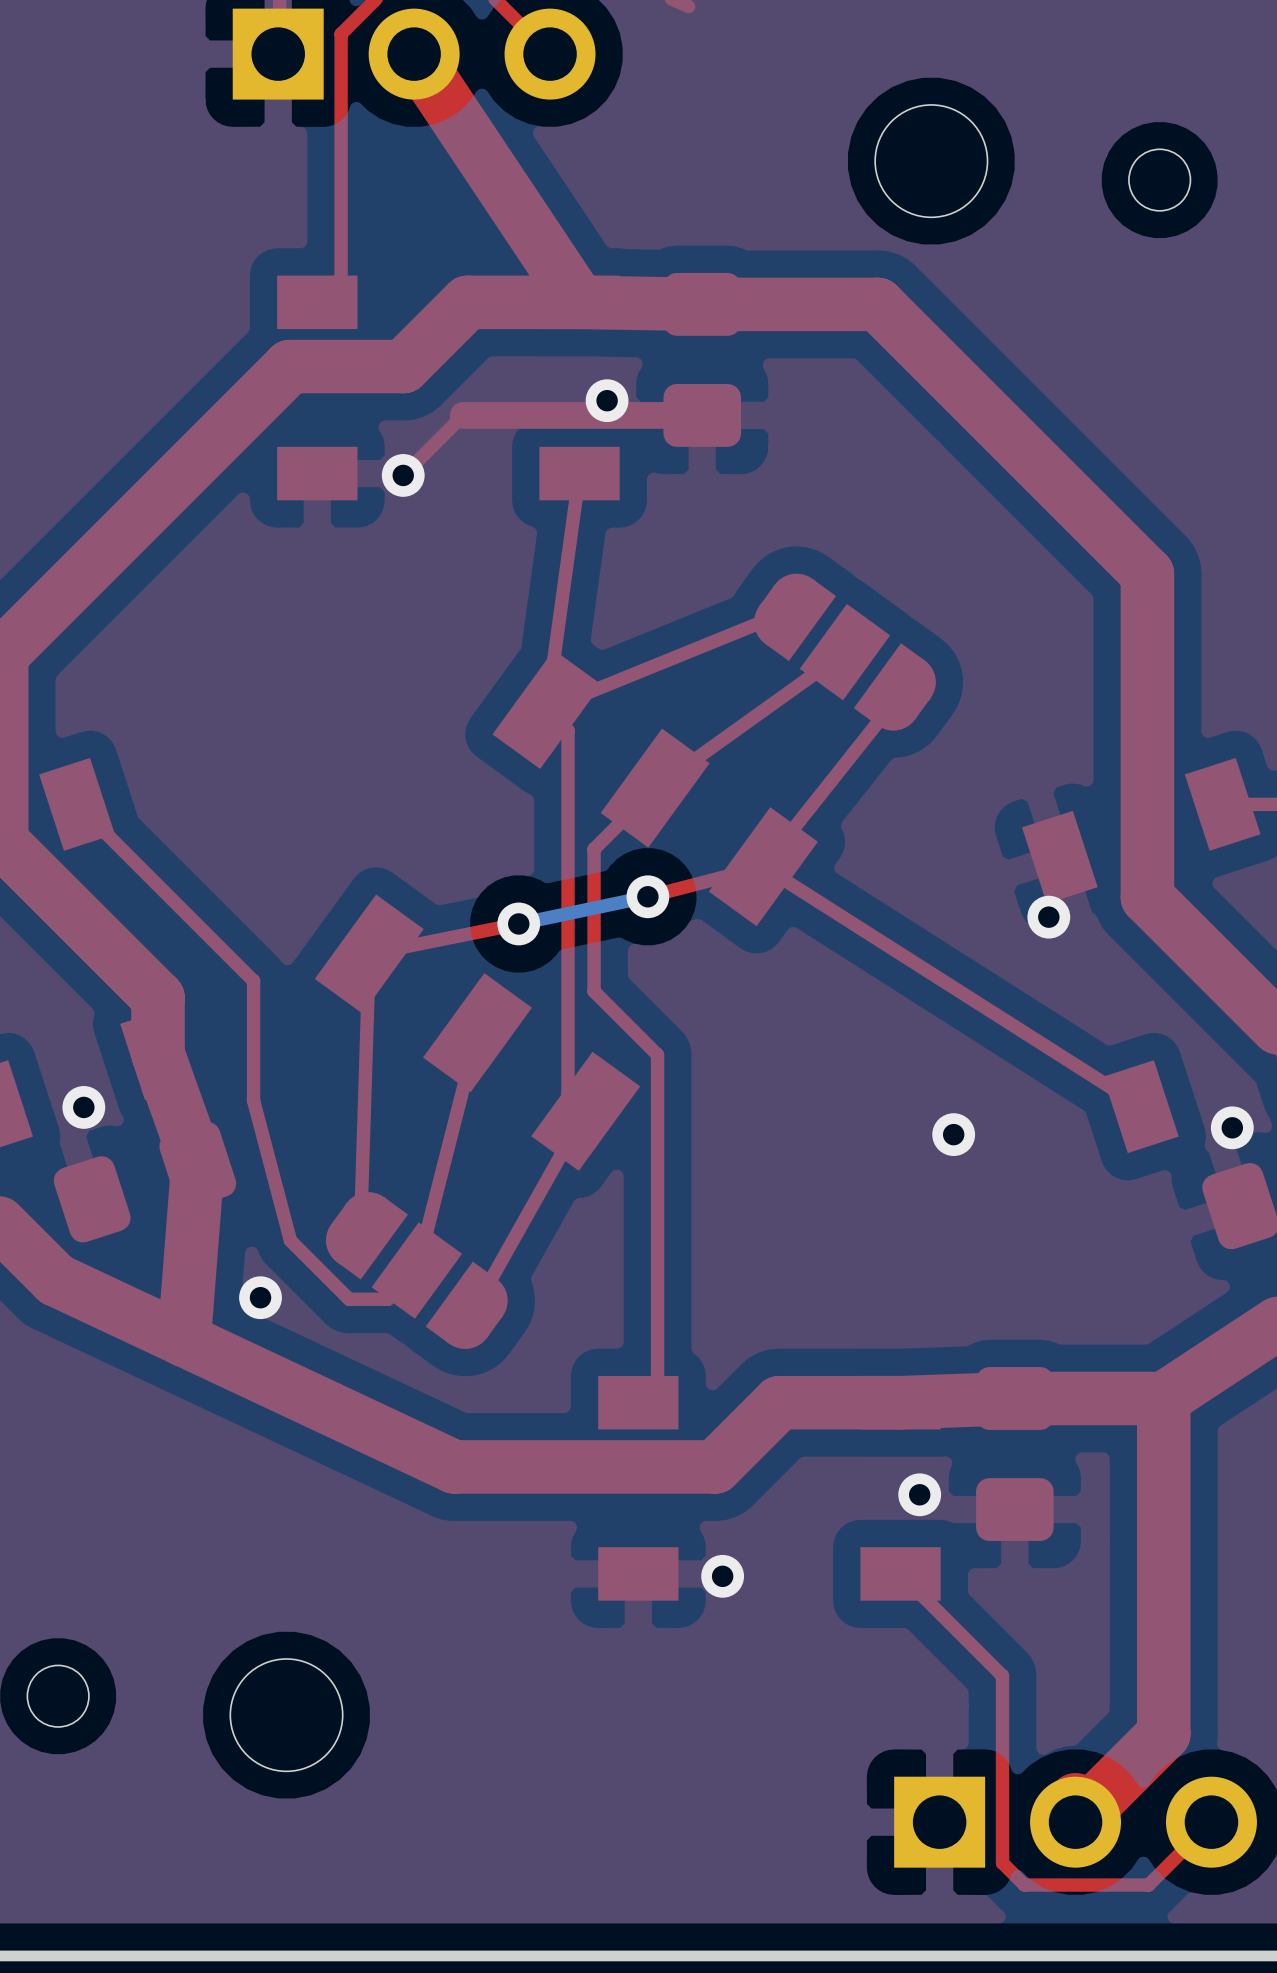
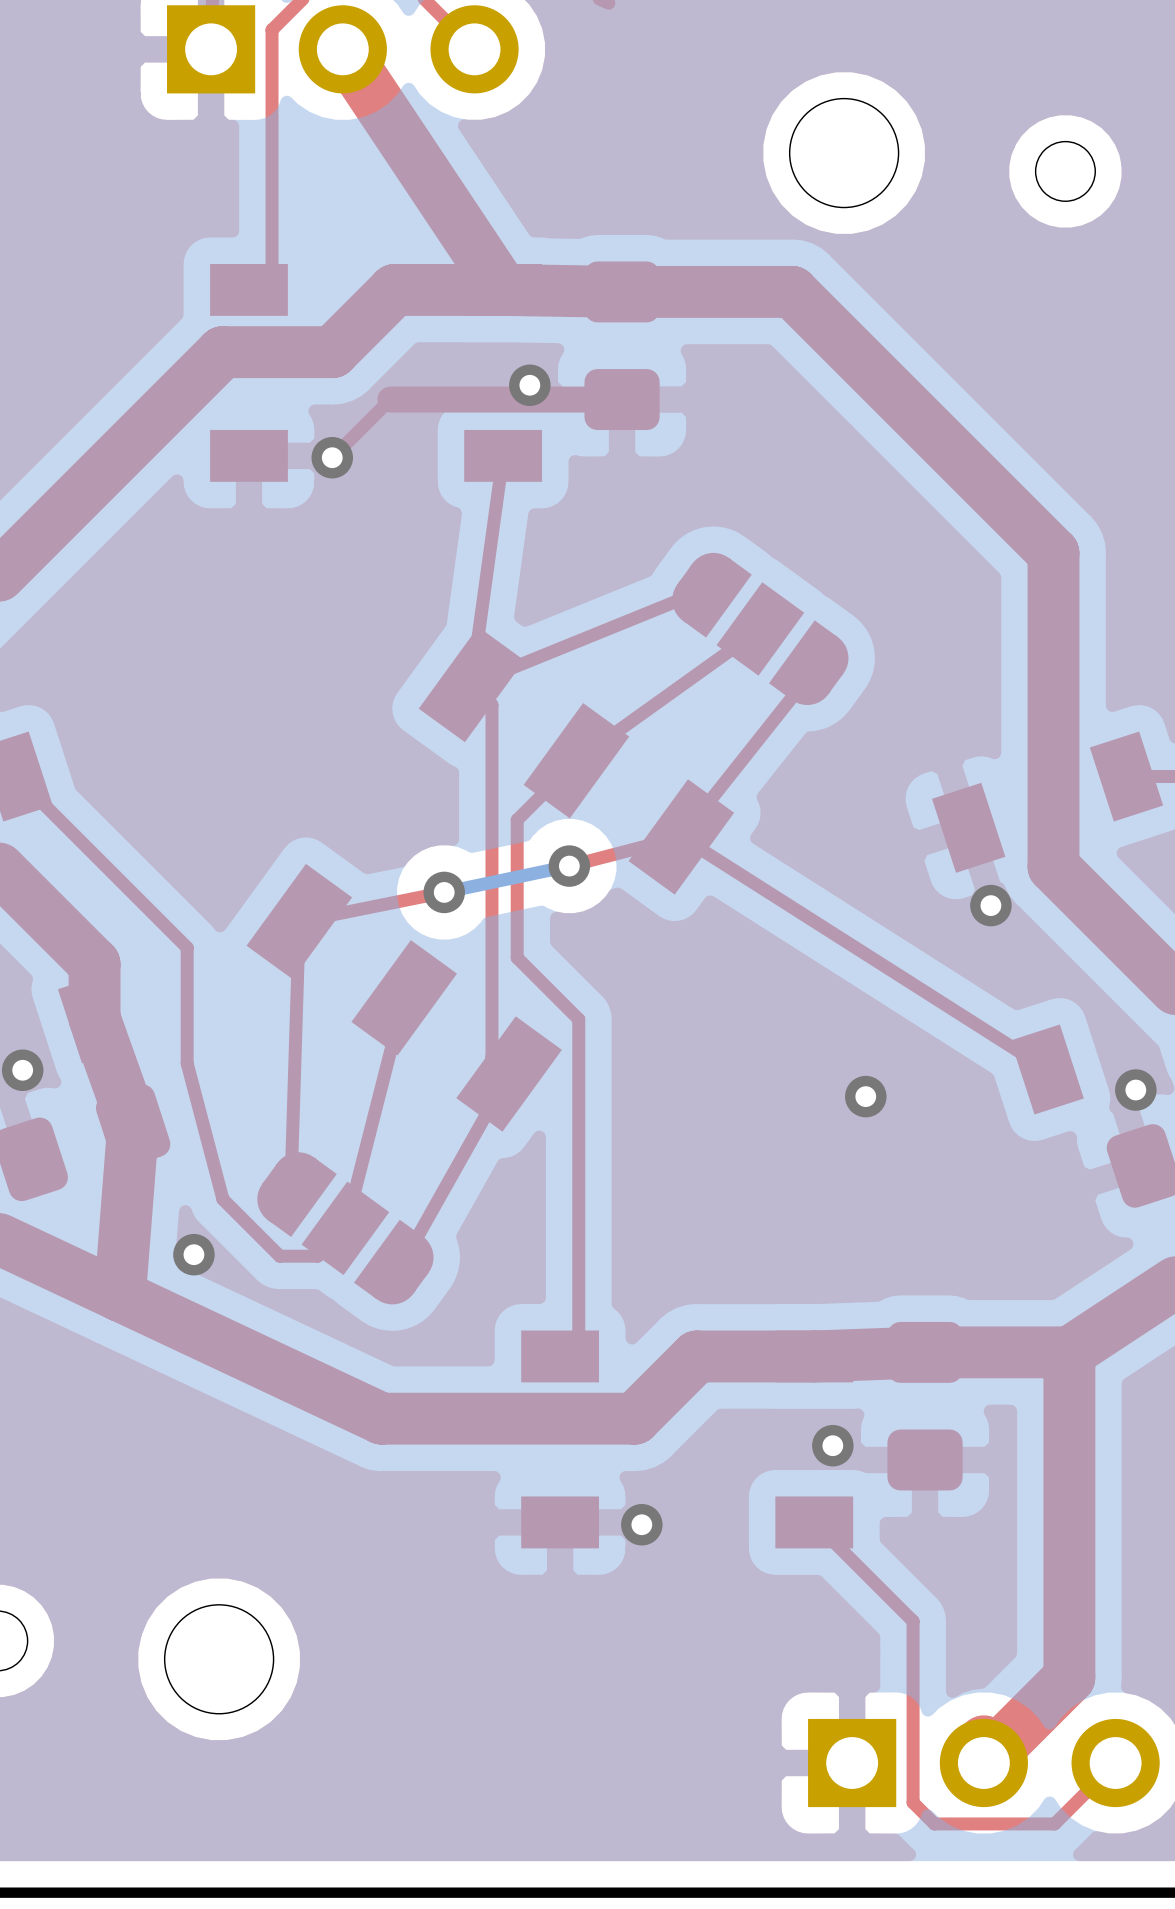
via position: (1048, 917) -> (990, 905)

